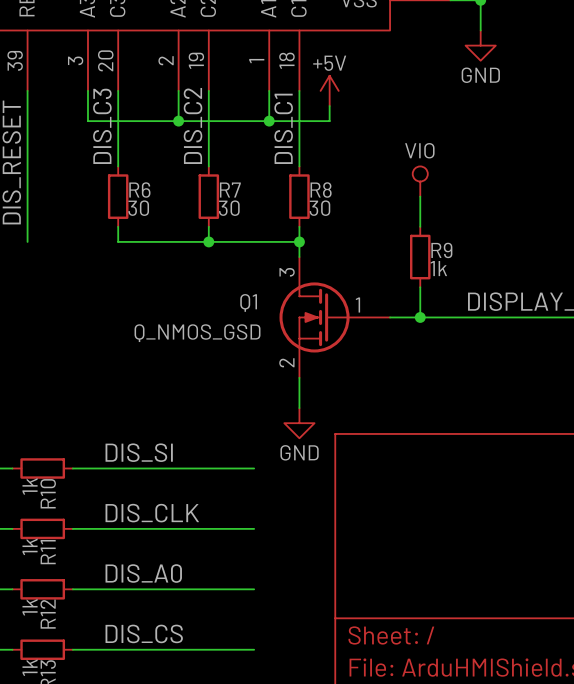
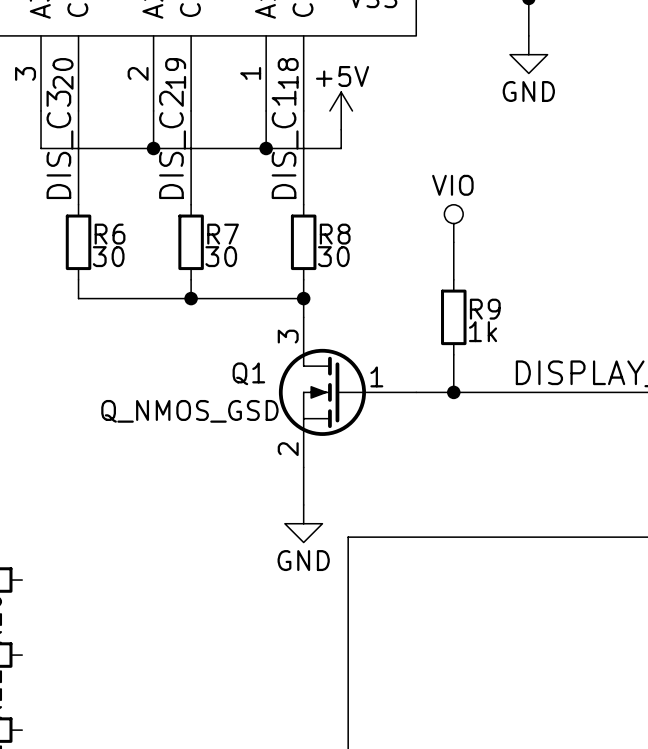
label: DIS_SI (139, 452) -> none
wire: (72, 468) (254, 468) -> none
label: DIS_CLK (152, 513) -> none
wire: (72, 528) (254, 528) -> none
label: DIS_A0 (143, 573) -> none
wire: (72, 589) (254, 589) -> none

